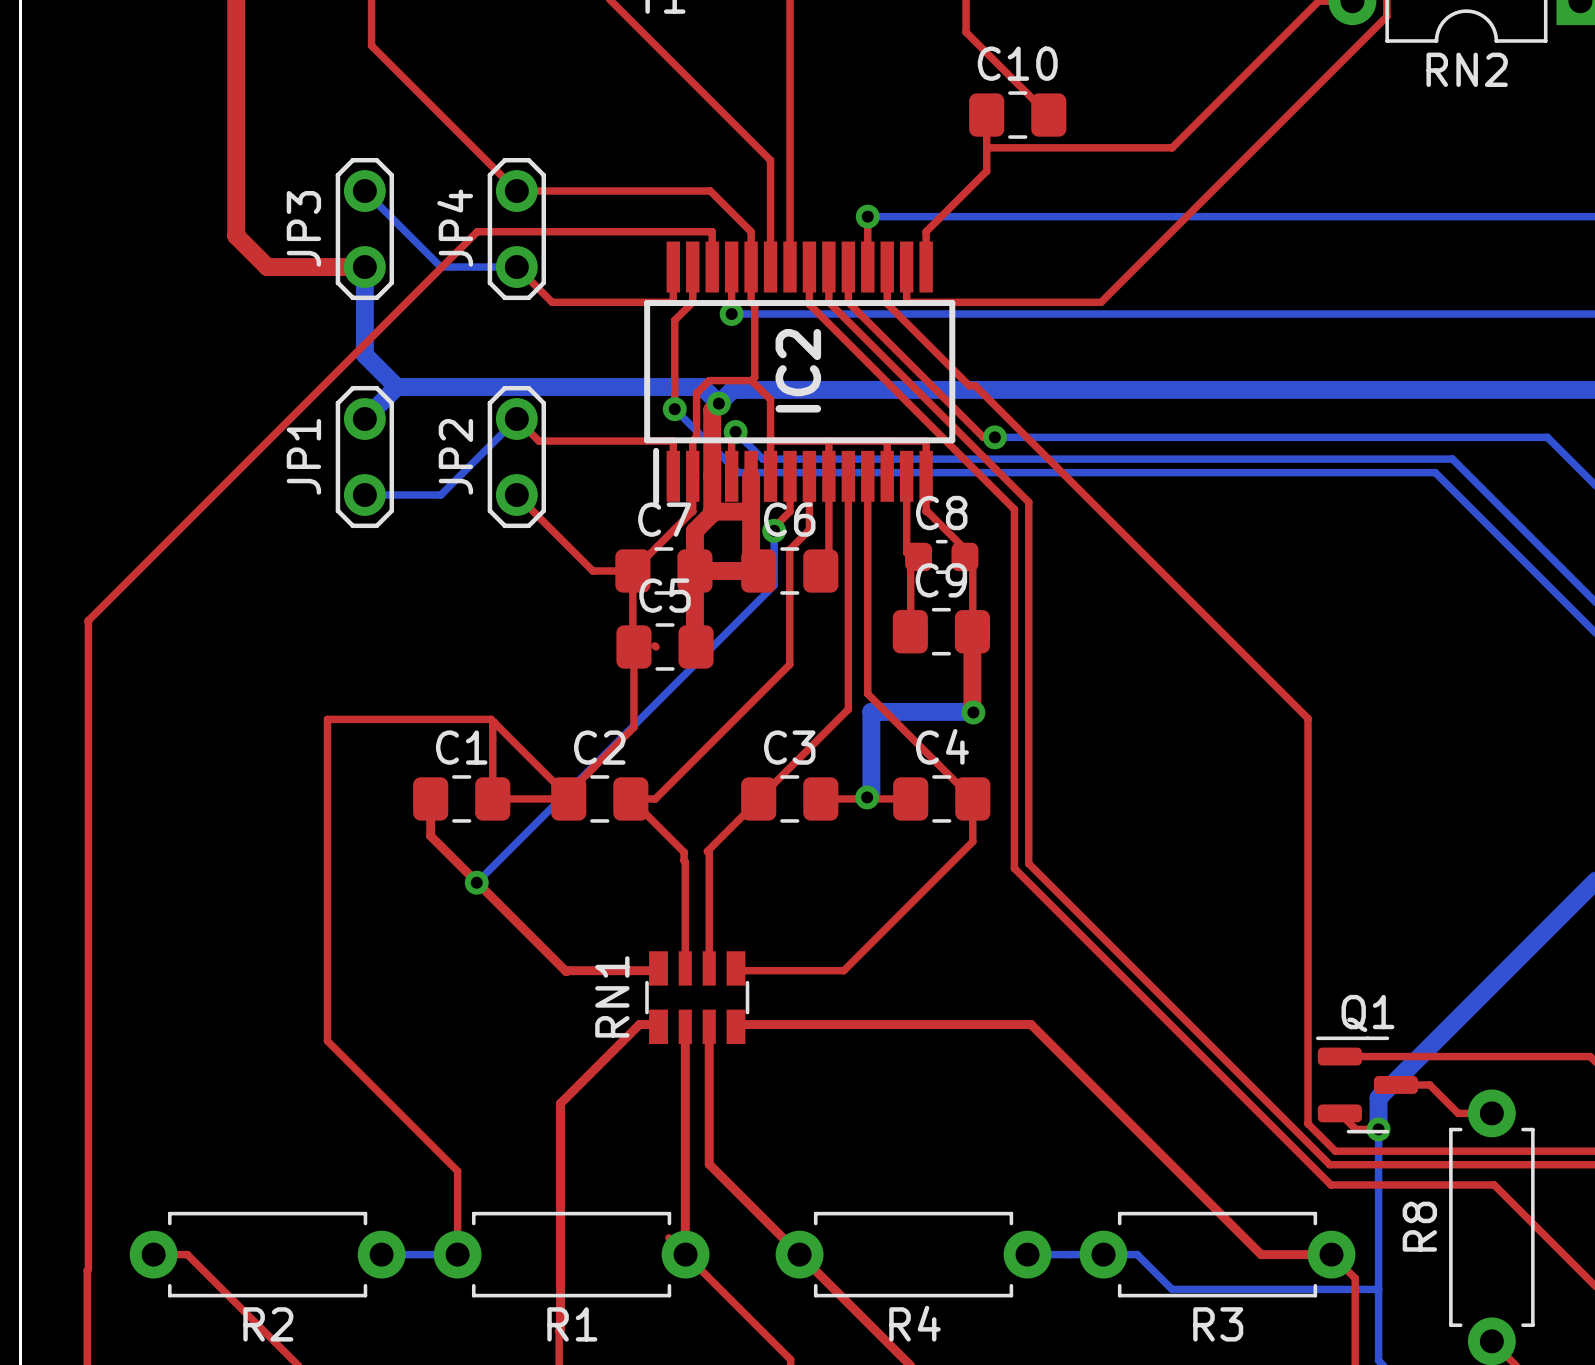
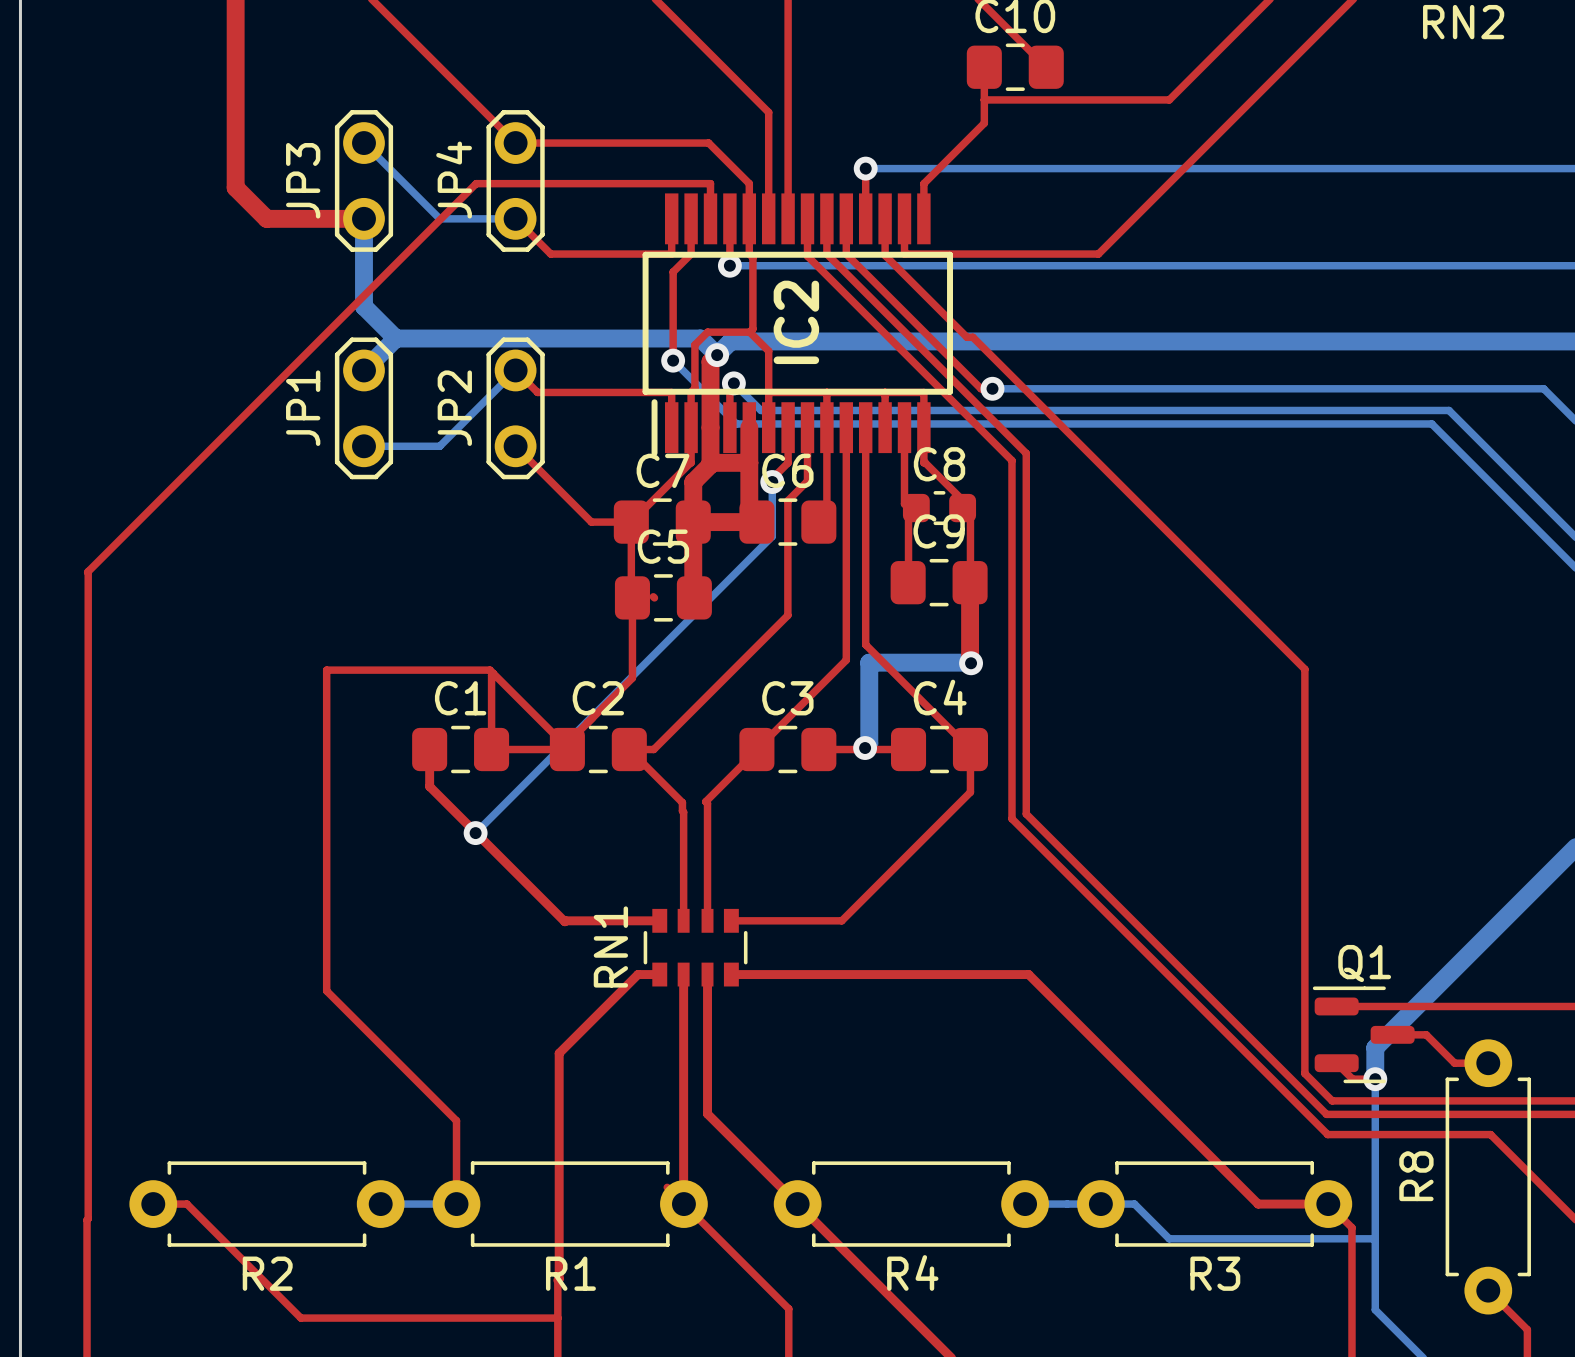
RN1 footprint: [645, 951, 750, 1044] -> [643, 908, 748, 987]

